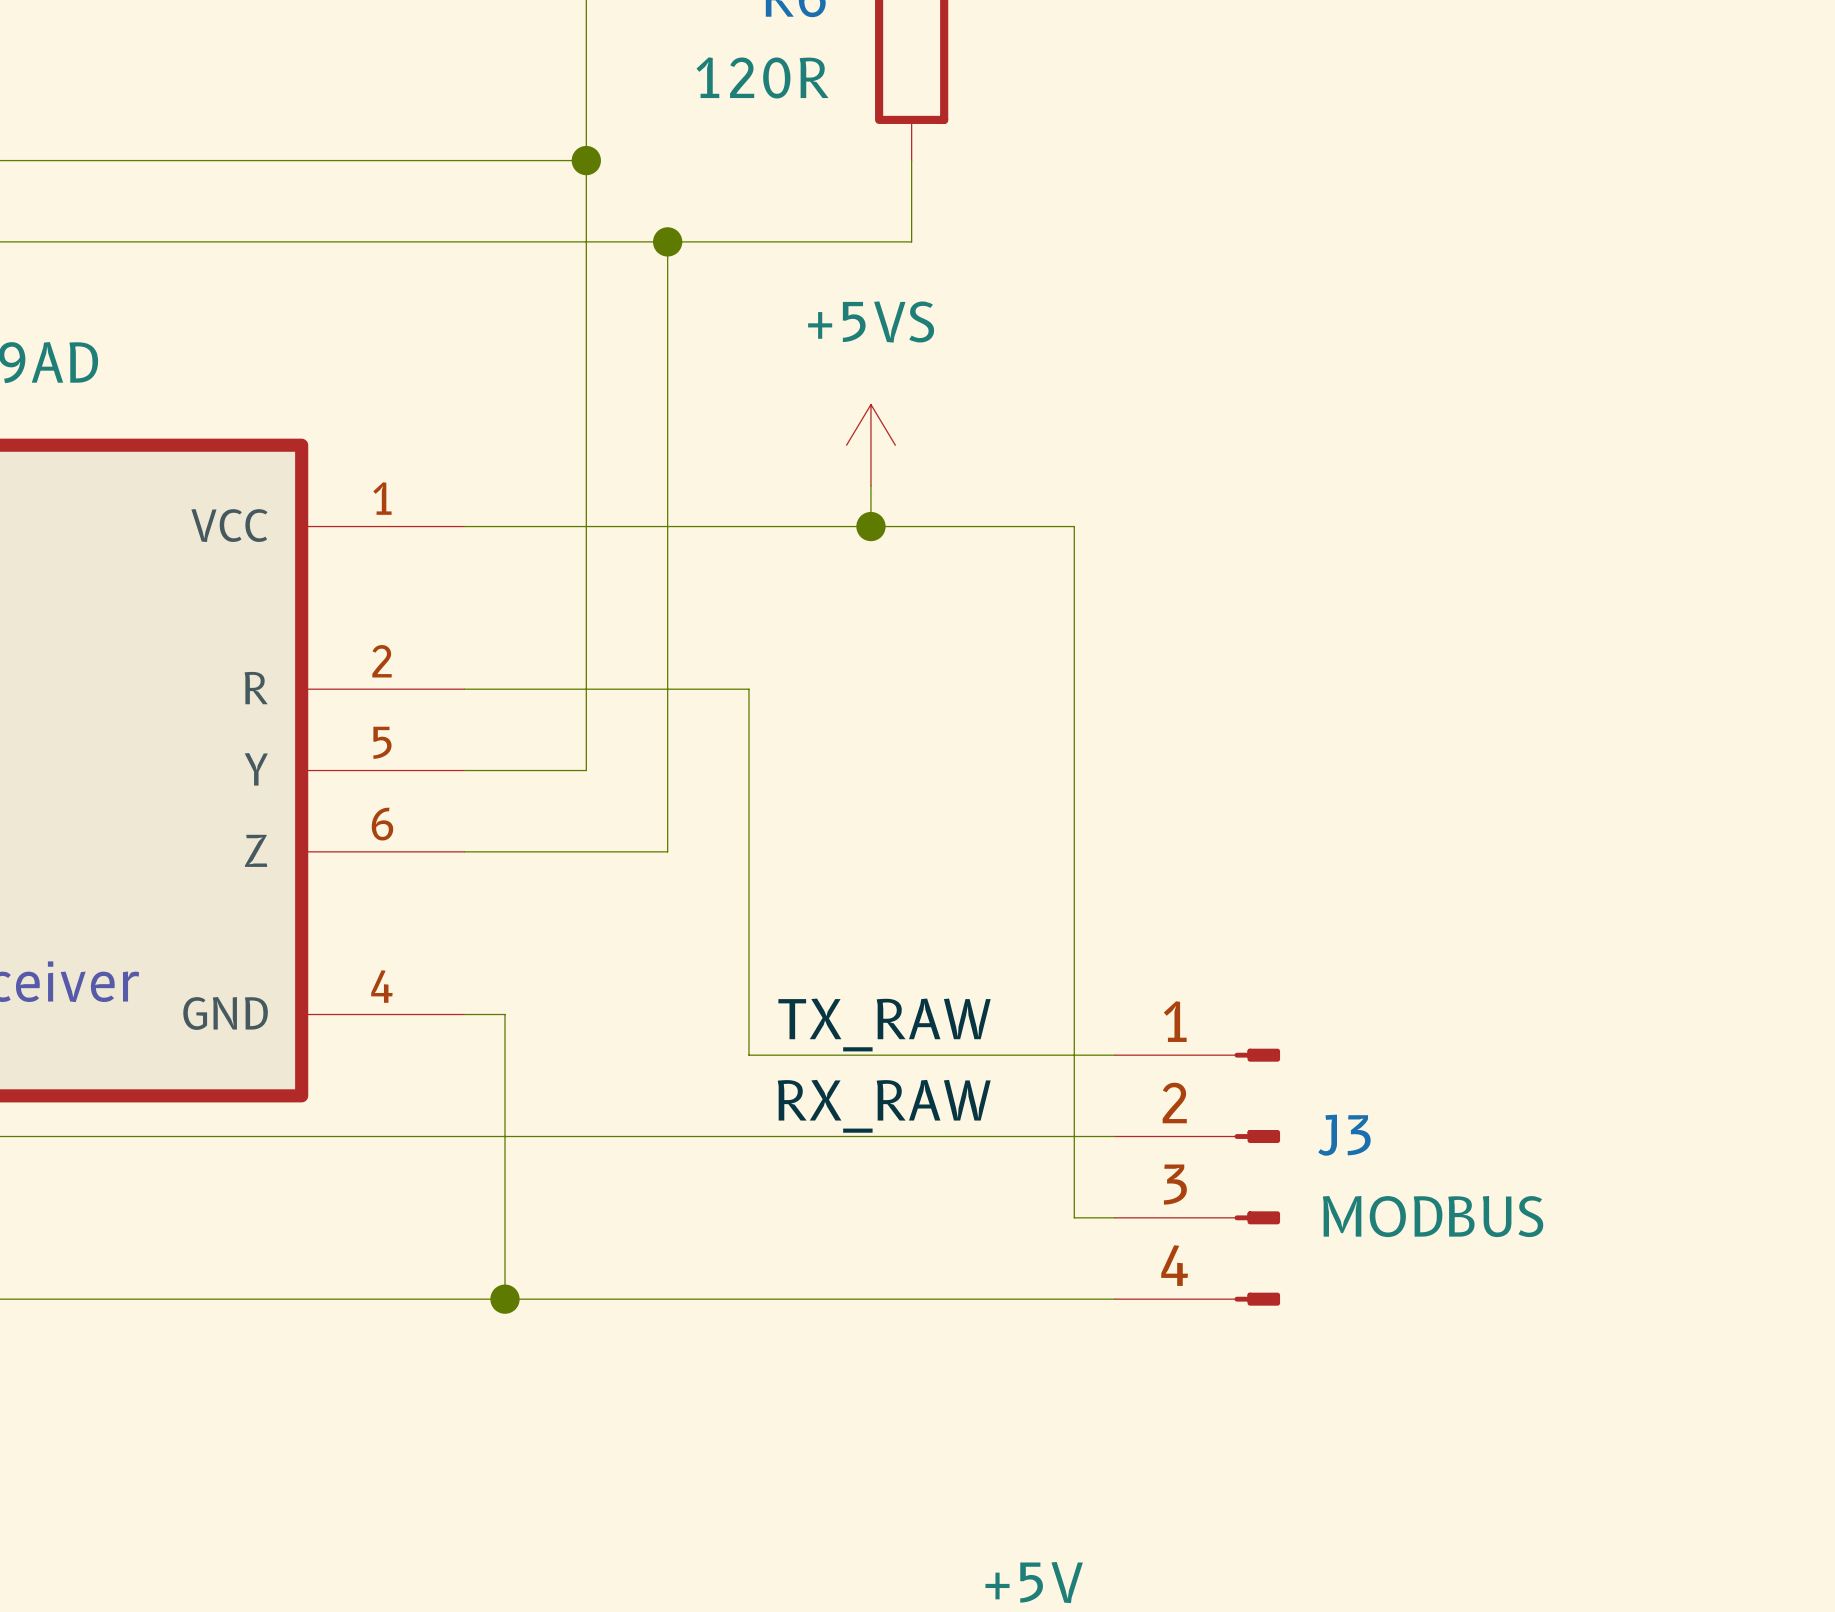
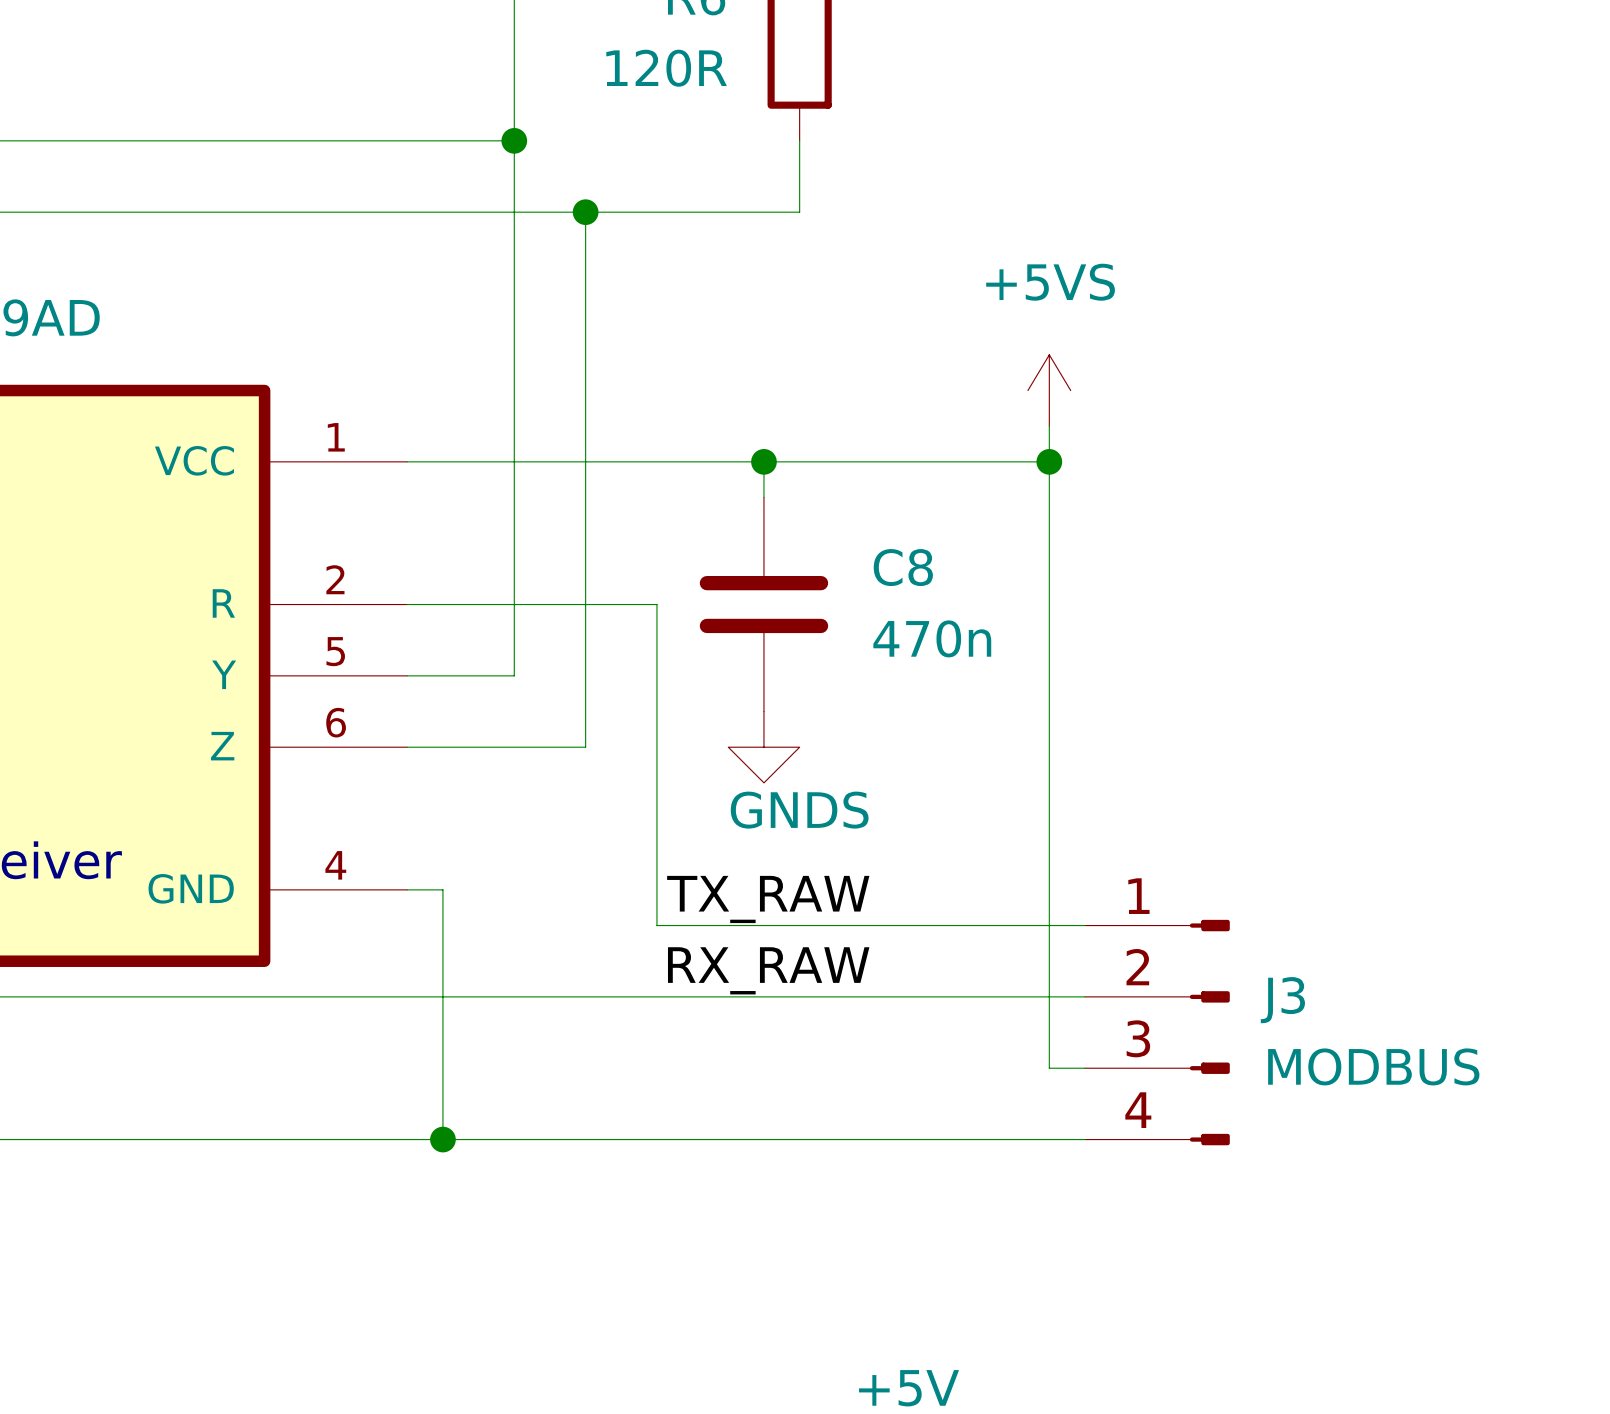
power symbol position: +5VS (870, 445) -> +5VS (1049, 390)
wire: (870, 485) (870, 526) -> (763, 497) (763, 461)
wire: none -> (1049, 426) (1049, 1068) (1084, 1068)
wire: (1074, 526) (1074, 1217) (1114, 1217) -> (942, 461) (1049, 461)
junction: none -> (1049, 461)
C8: none -> 470n (763, 604)
power symbol: none -> GNDS (763, 747)
J3 position: (1197, 1177) -> (1157, 1032)

